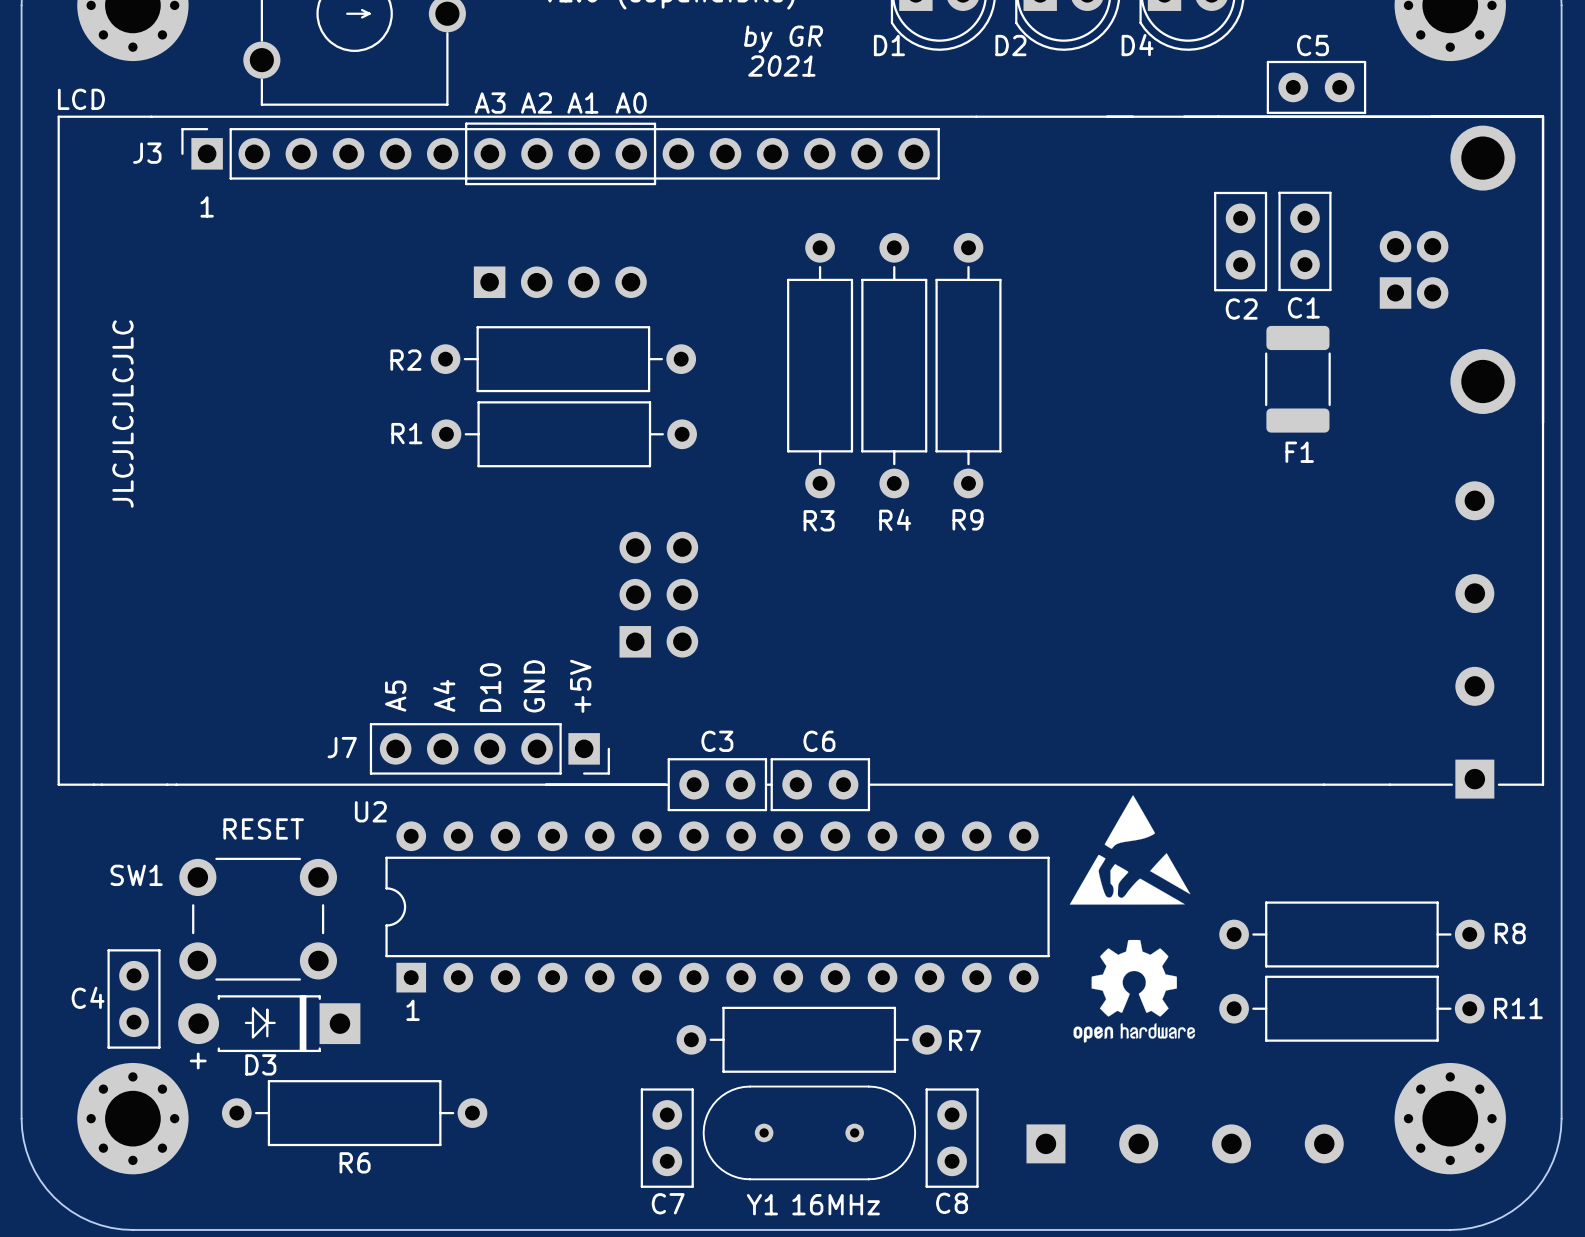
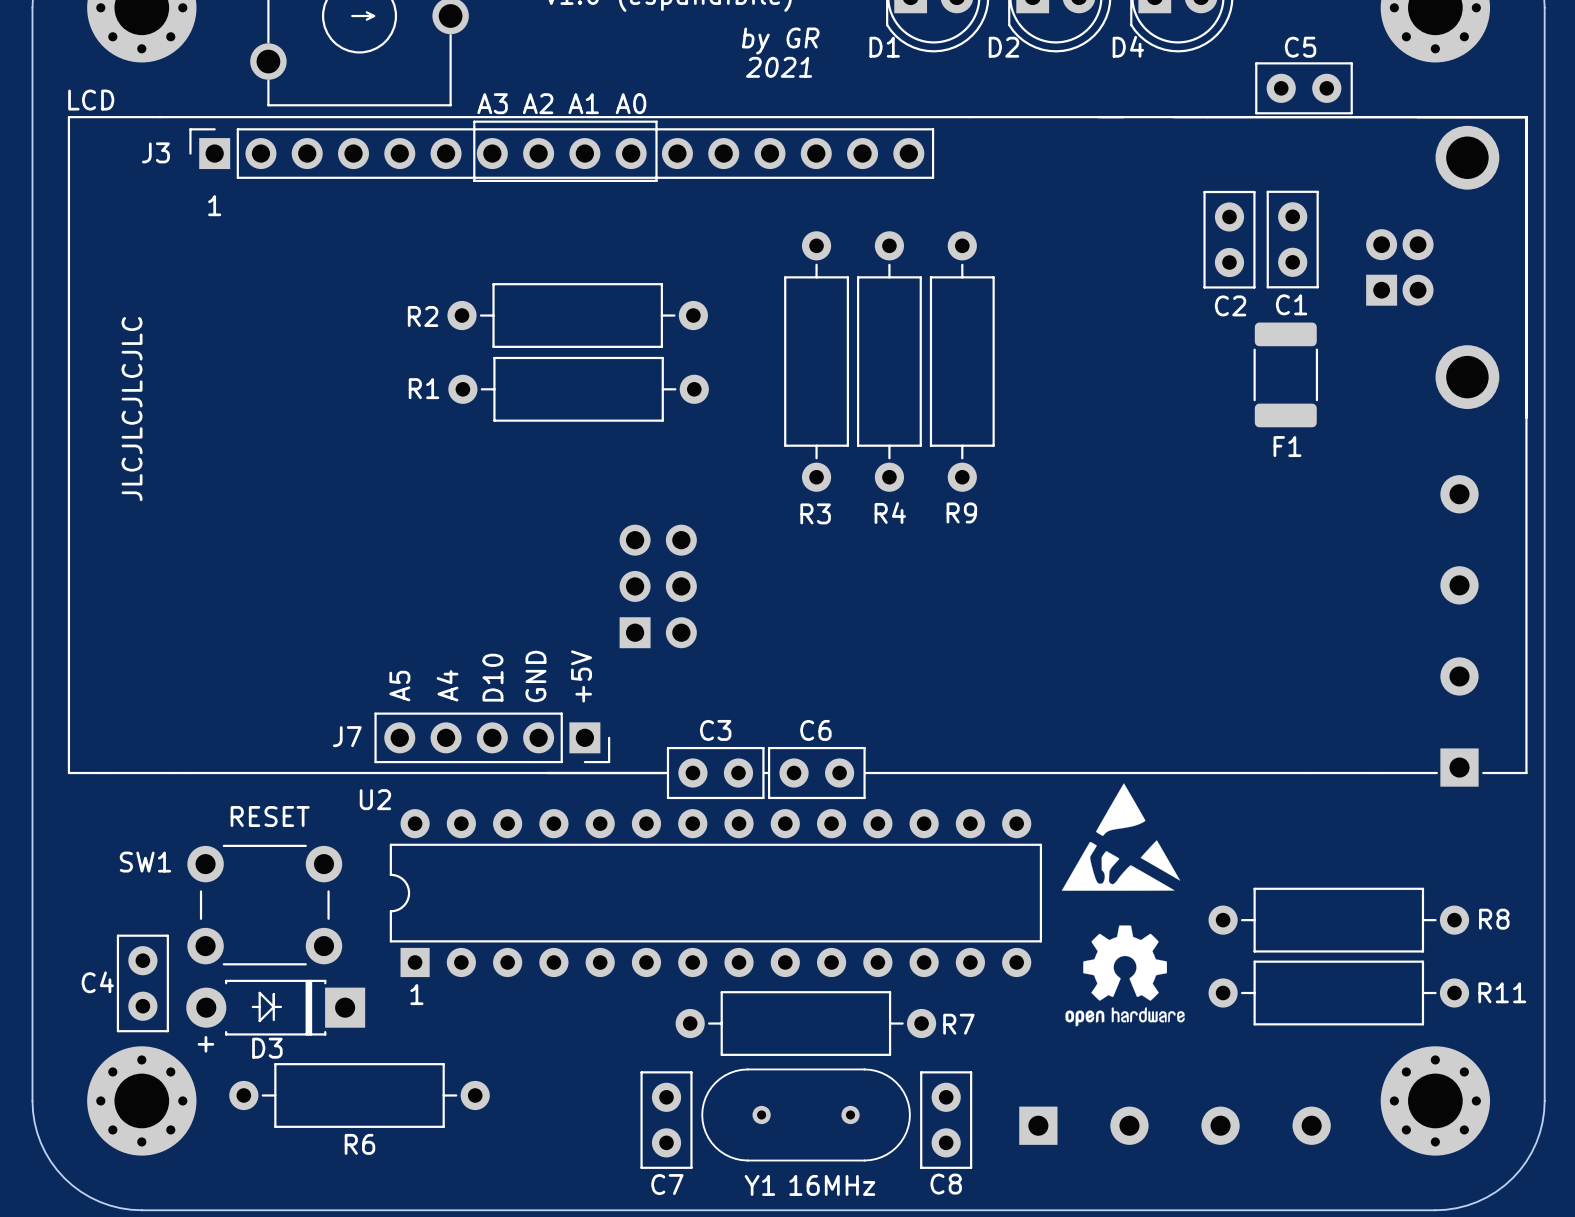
line: none -> (474, 121) (656, 121) (656, 180) (474, 180) (474, 121)
line: (466, 123) (466, 184) (655, 184) (655, 123) (466, 123) -> none
part: (560, 282) -> none
R2 position: (563, 359) -> (577, 315)
R1 position: (564, 434) -> (578, 389)

